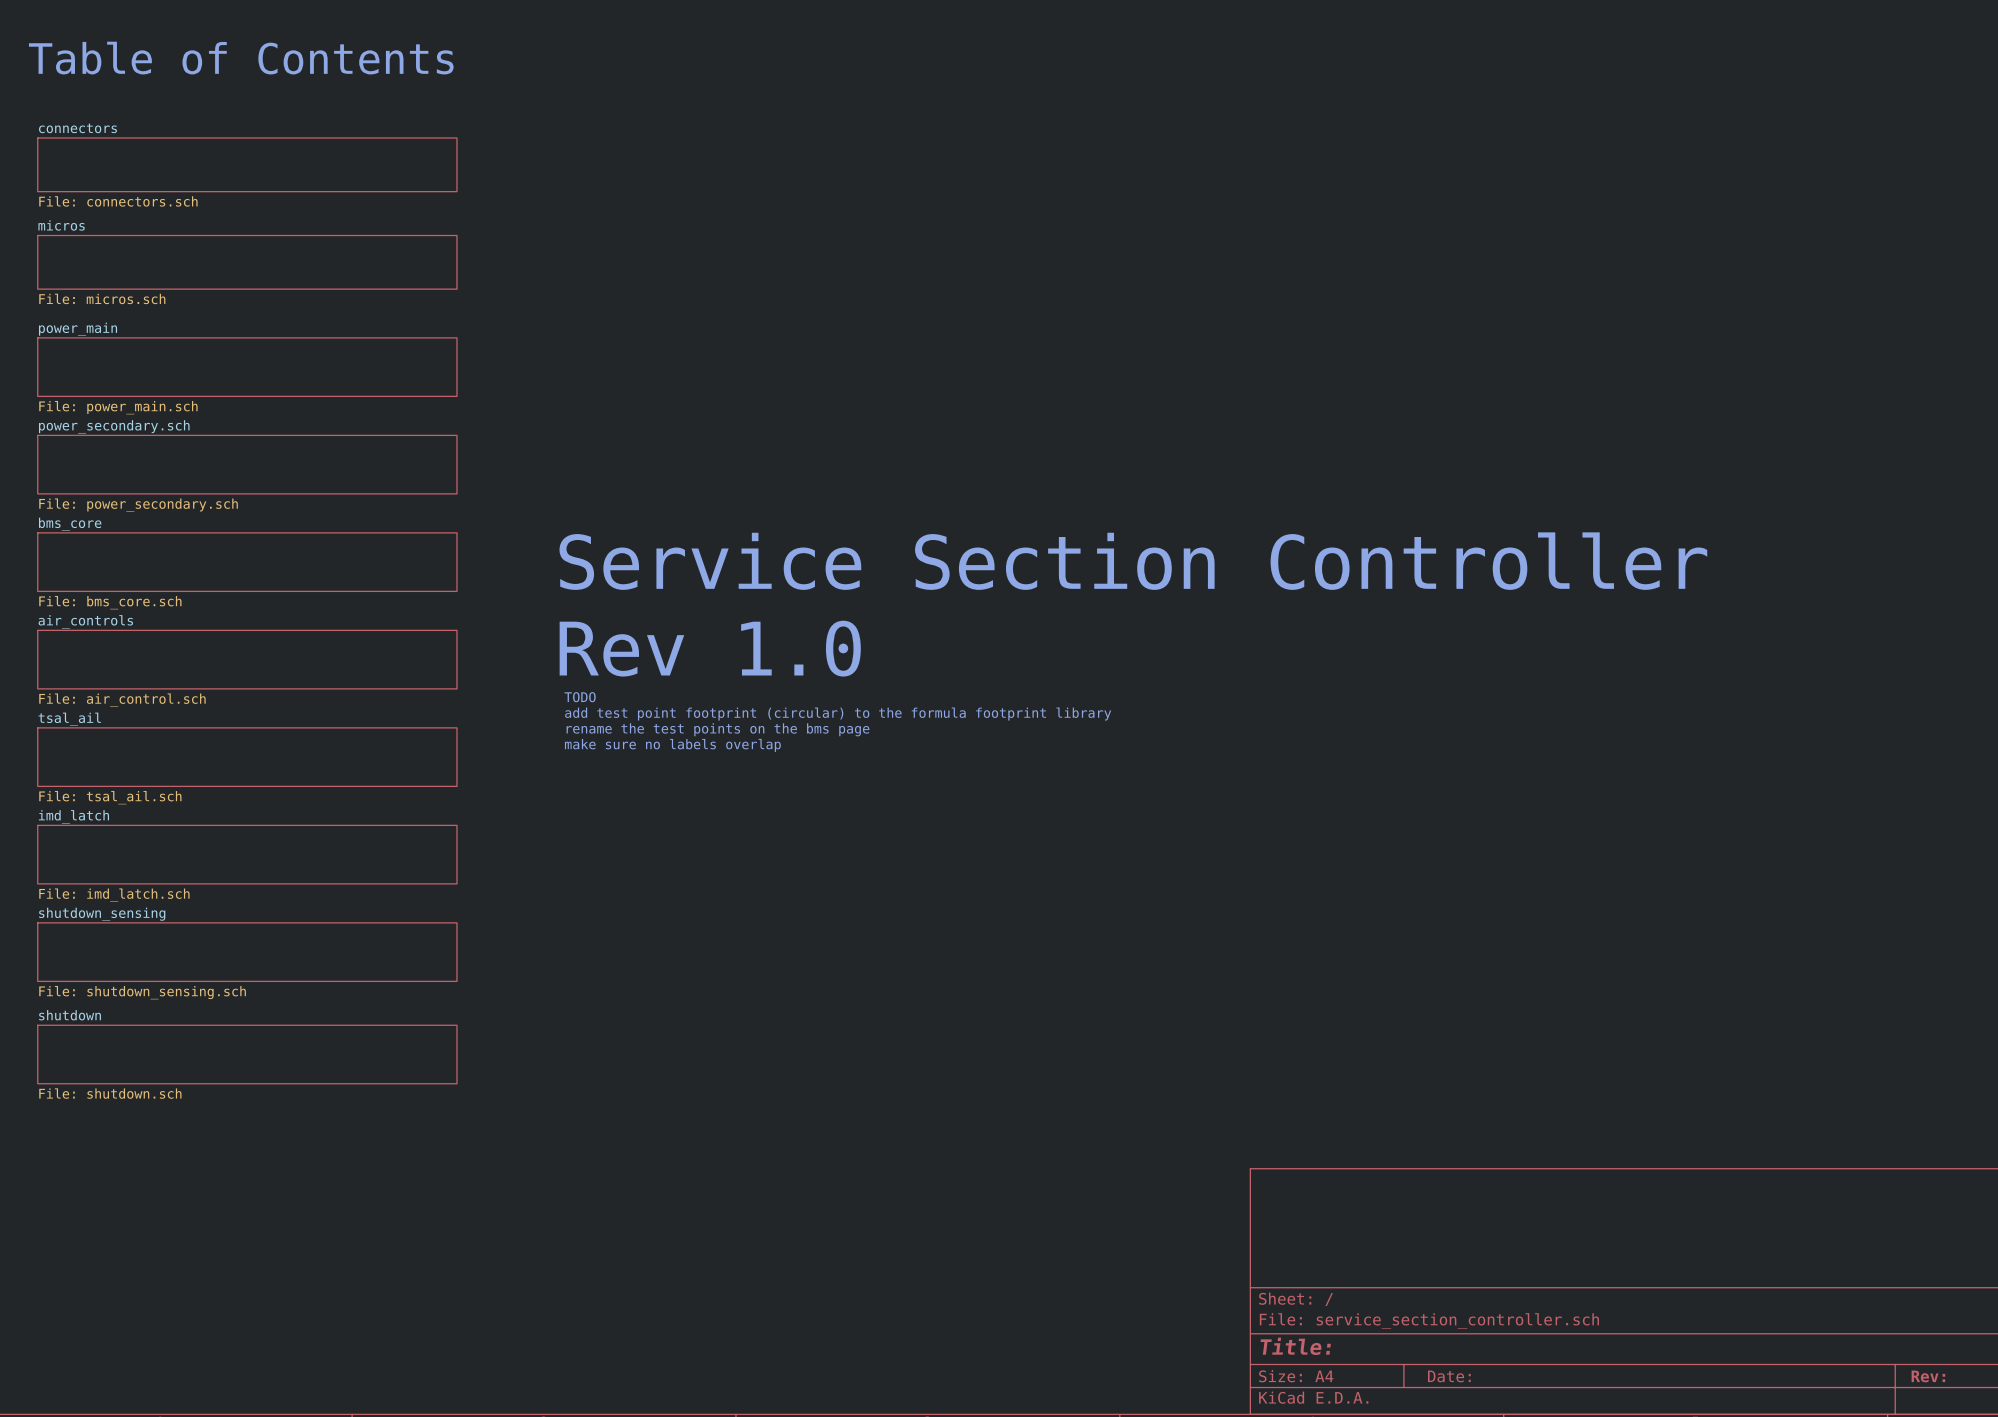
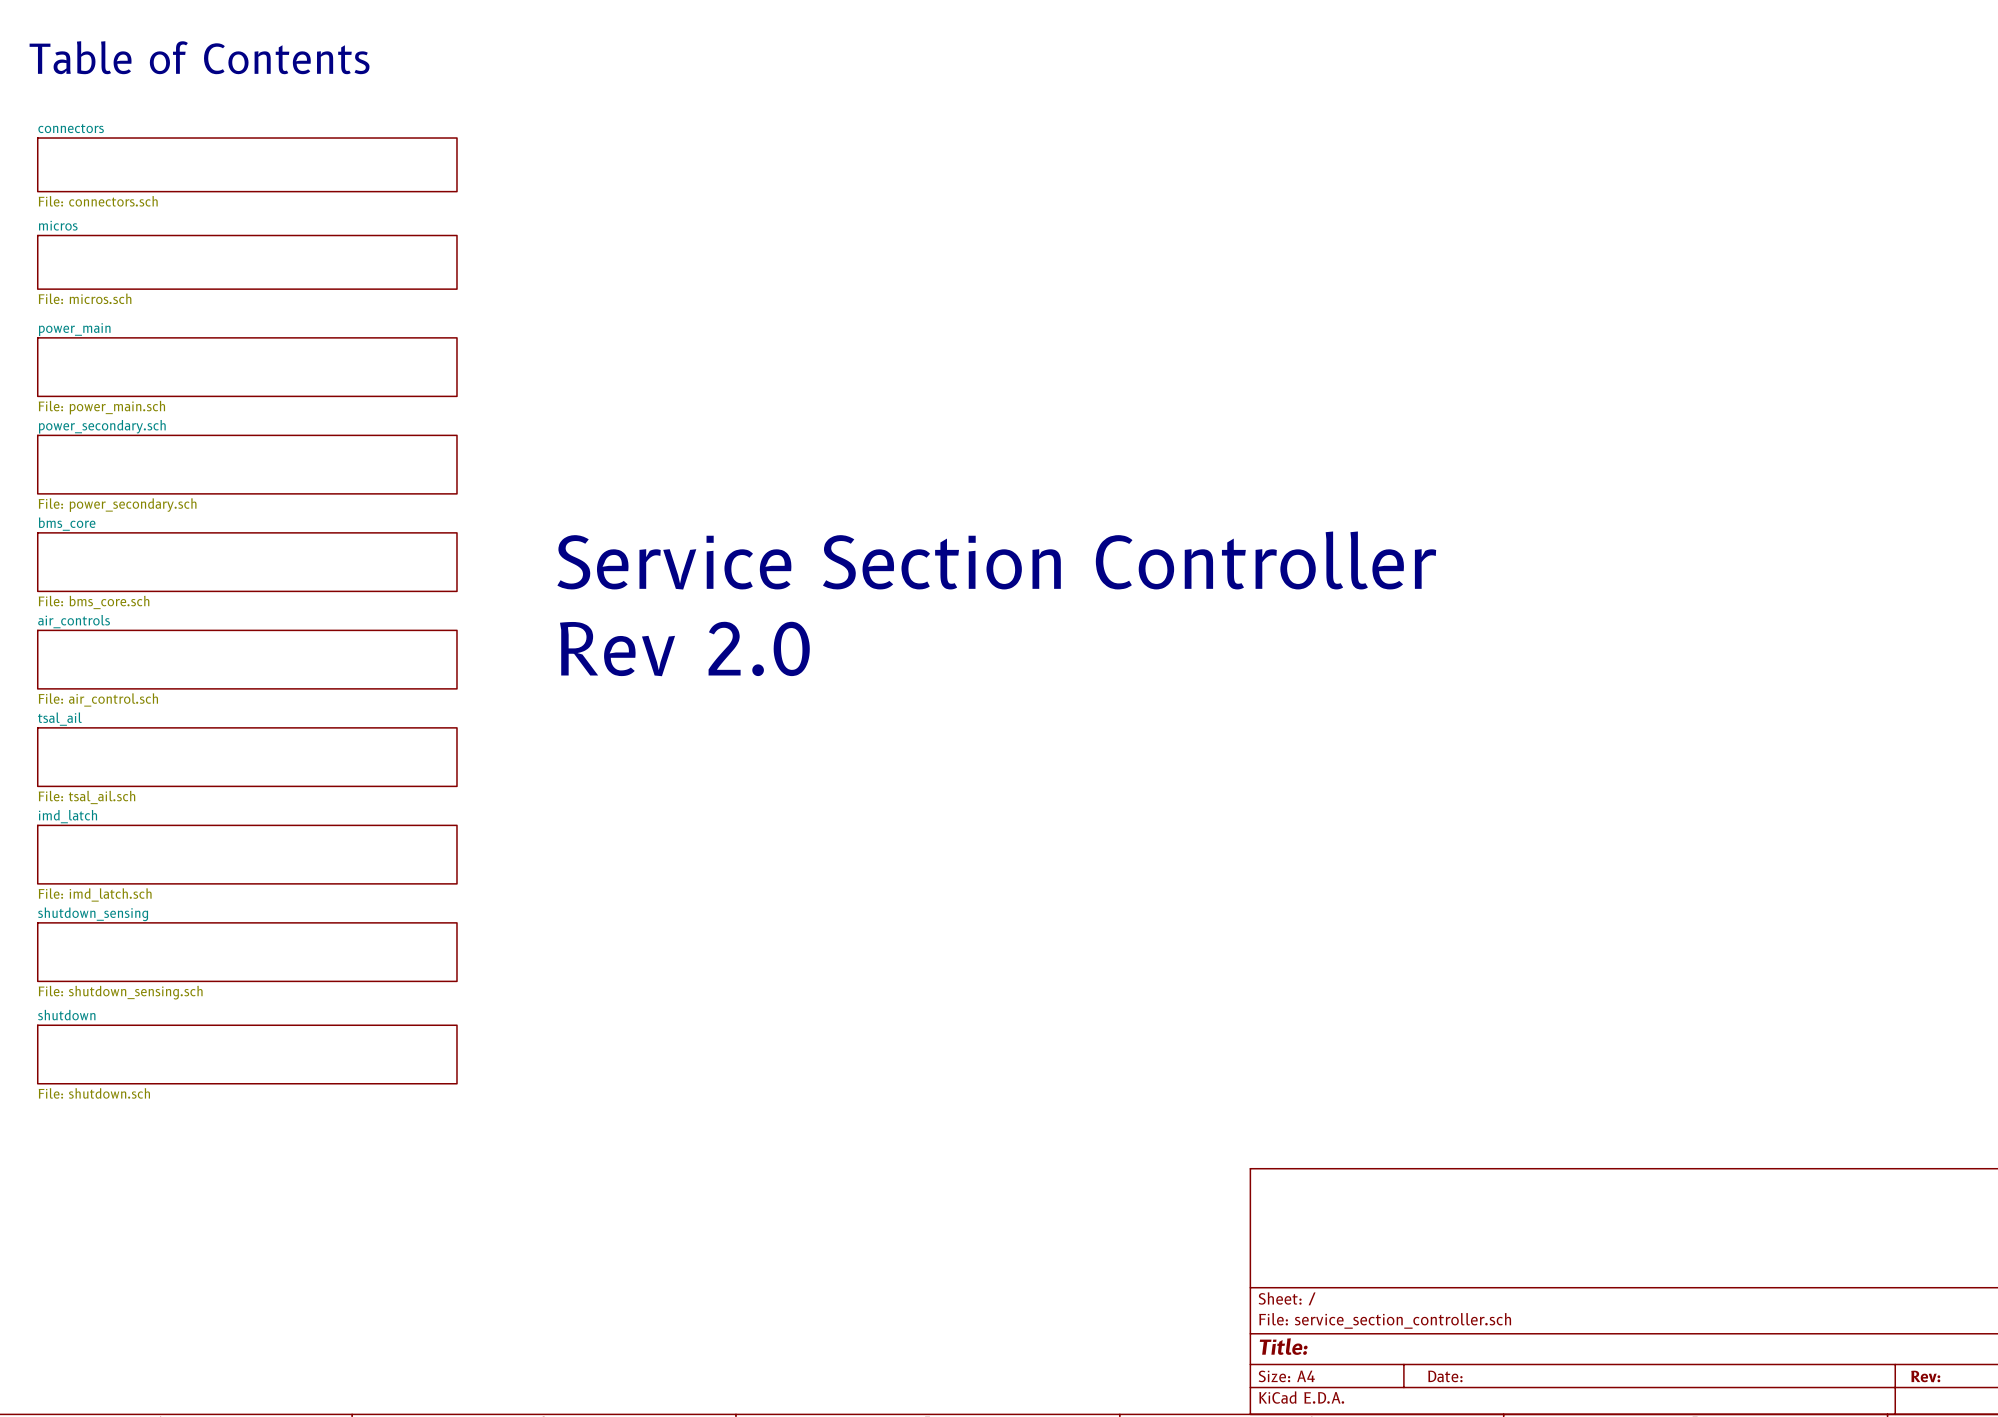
text: Rev 1.0 (710, 648) -> Rev 2.0 (684, 649)
text: TODO (580, 697) -> none
text: add test point footprint (circular) to the formula footprint library (838, 714) -> none
text: rename the test points on the bms page (718, 729) -> none
text: make sure no labels overlap (672, 745) -> none

